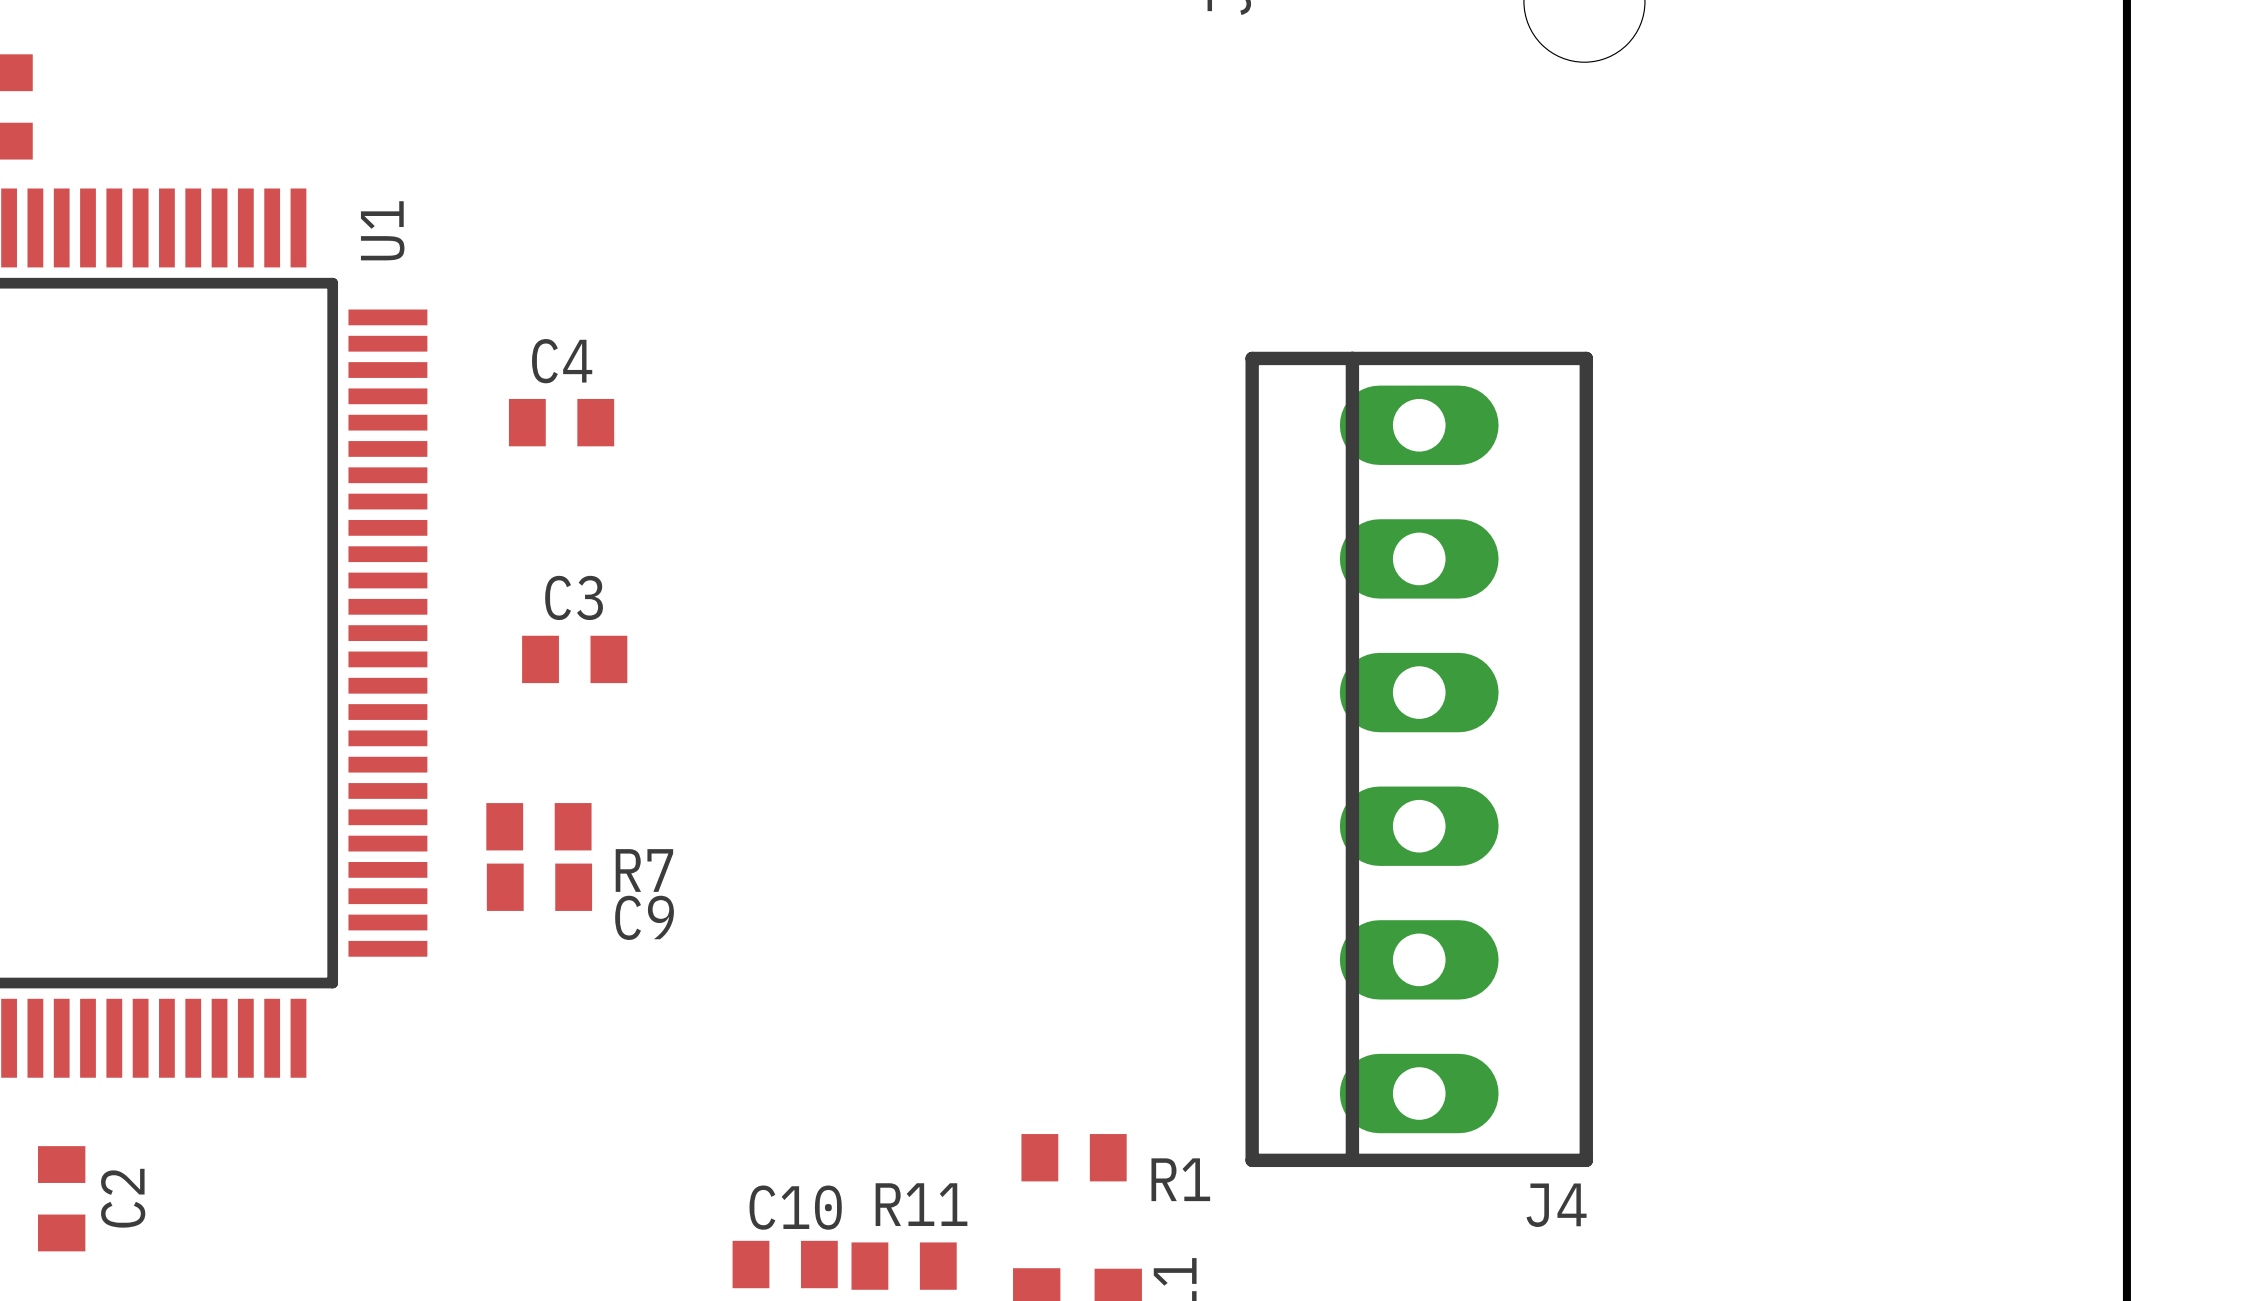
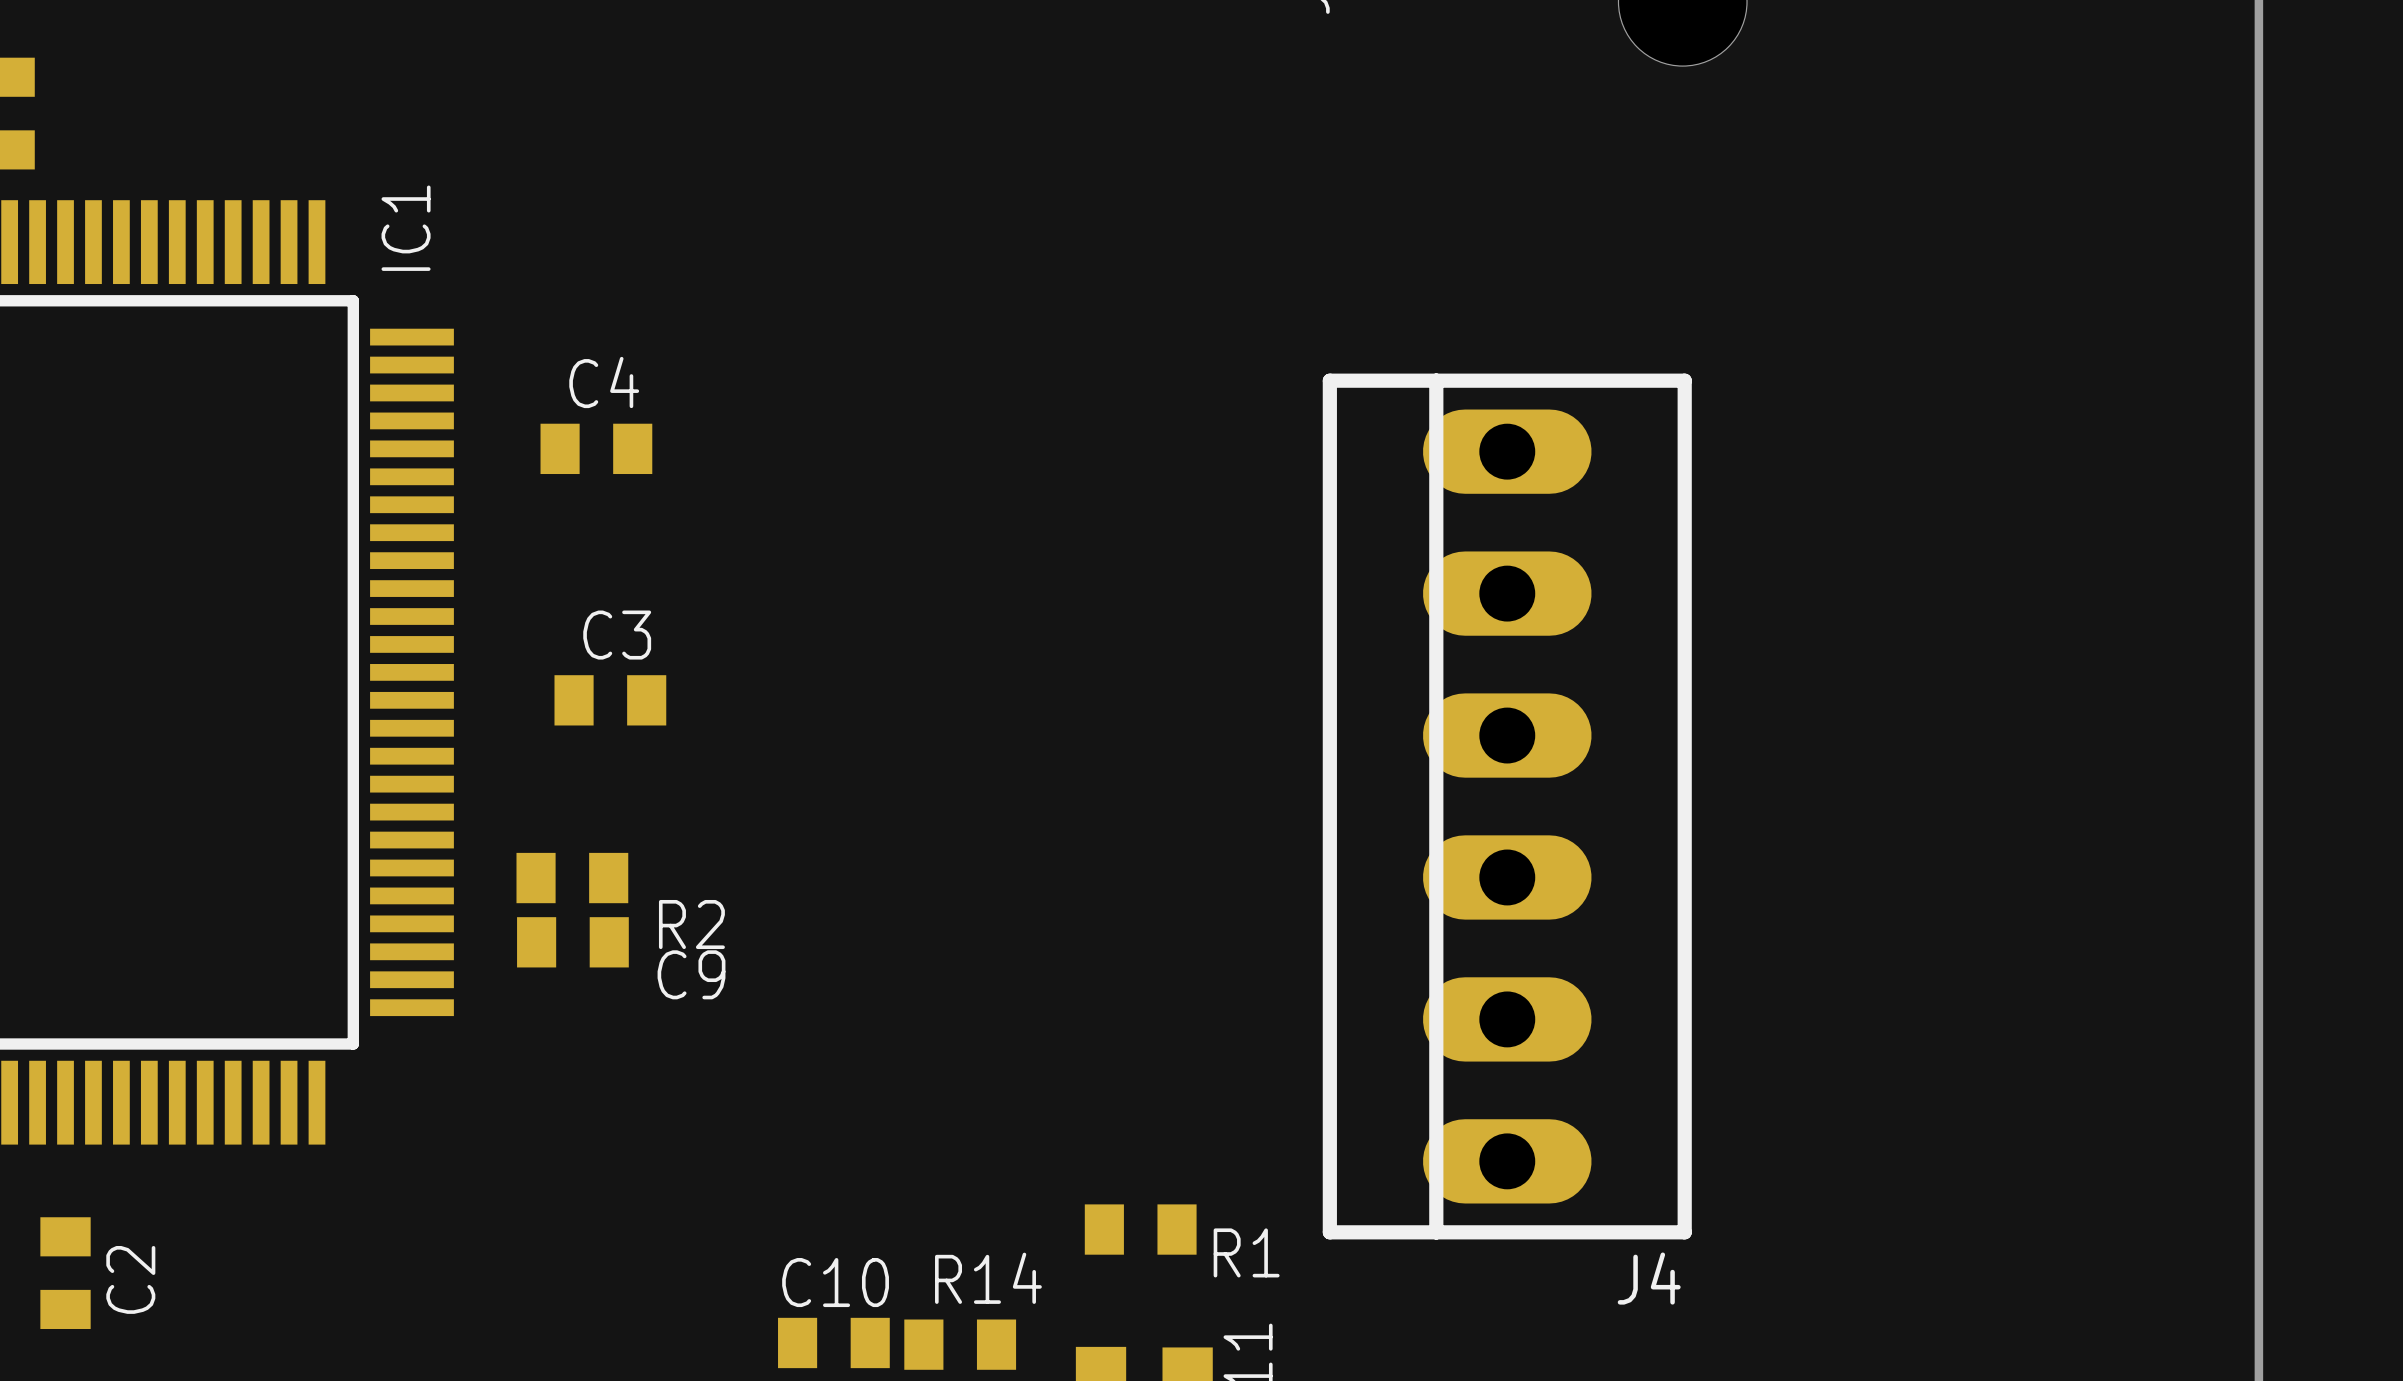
U1 name: U1 (382, 230) -> IC1 (406, 228)
R7 name: R7 (644, 870) -> R2 (691, 924)
R11 name: R11 (921, 1204) -> R14 (988, 1278)

